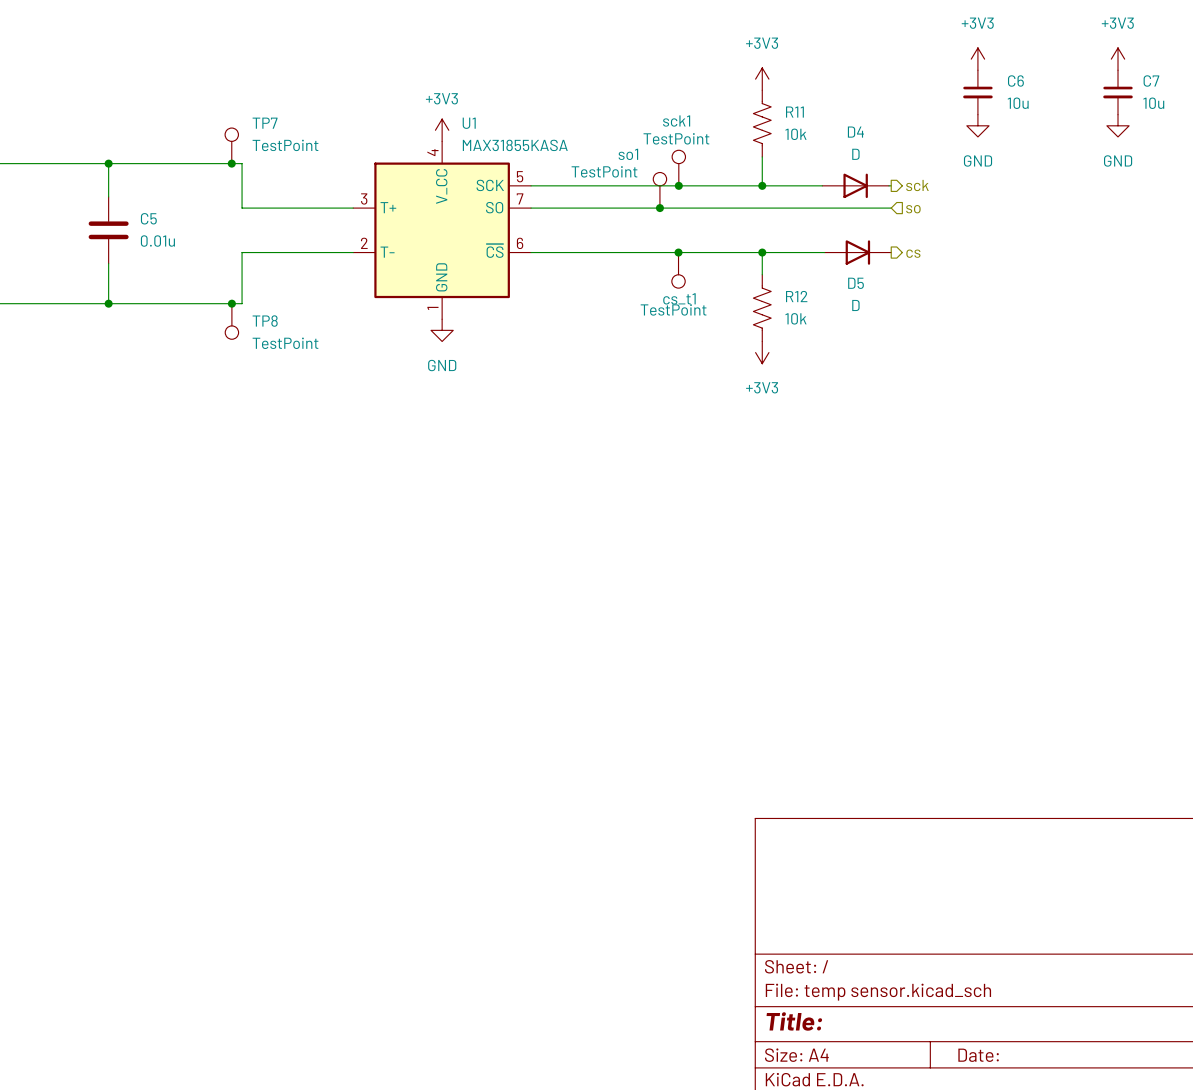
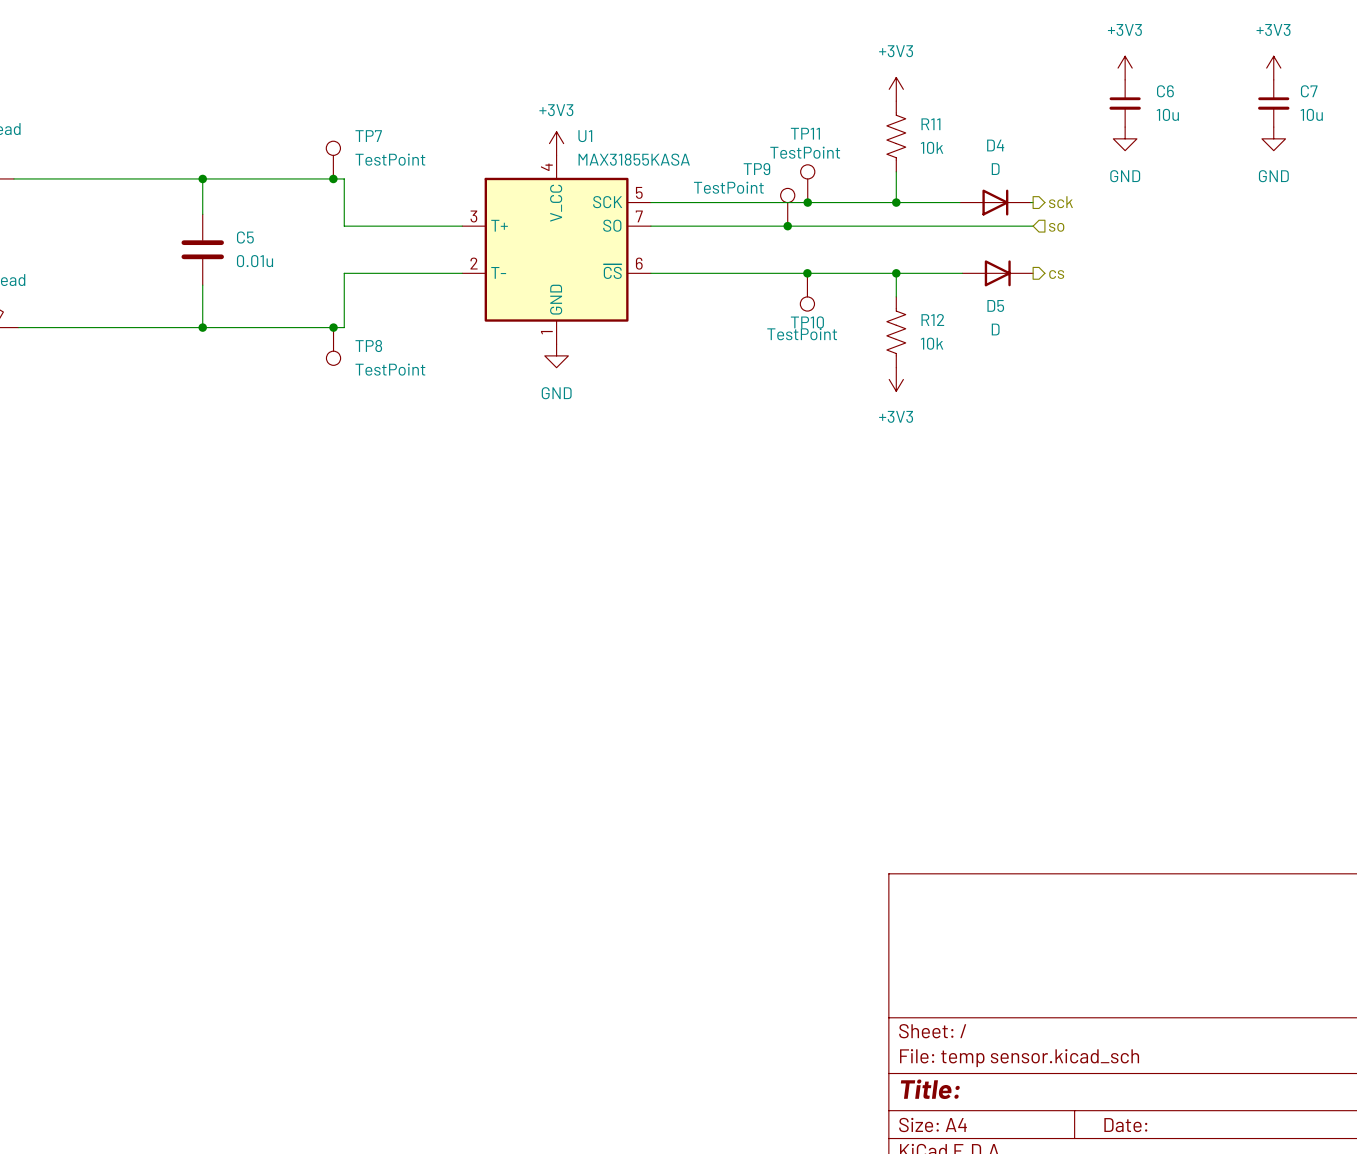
sck1 name: sck1 (676, 121) -> TP11 (805, 133)
so1 name: so1 (628, 154) -> TP9 (756, 169)
cs_t1 name: cs_t1 (679, 298) -> TP10 (807, 322)

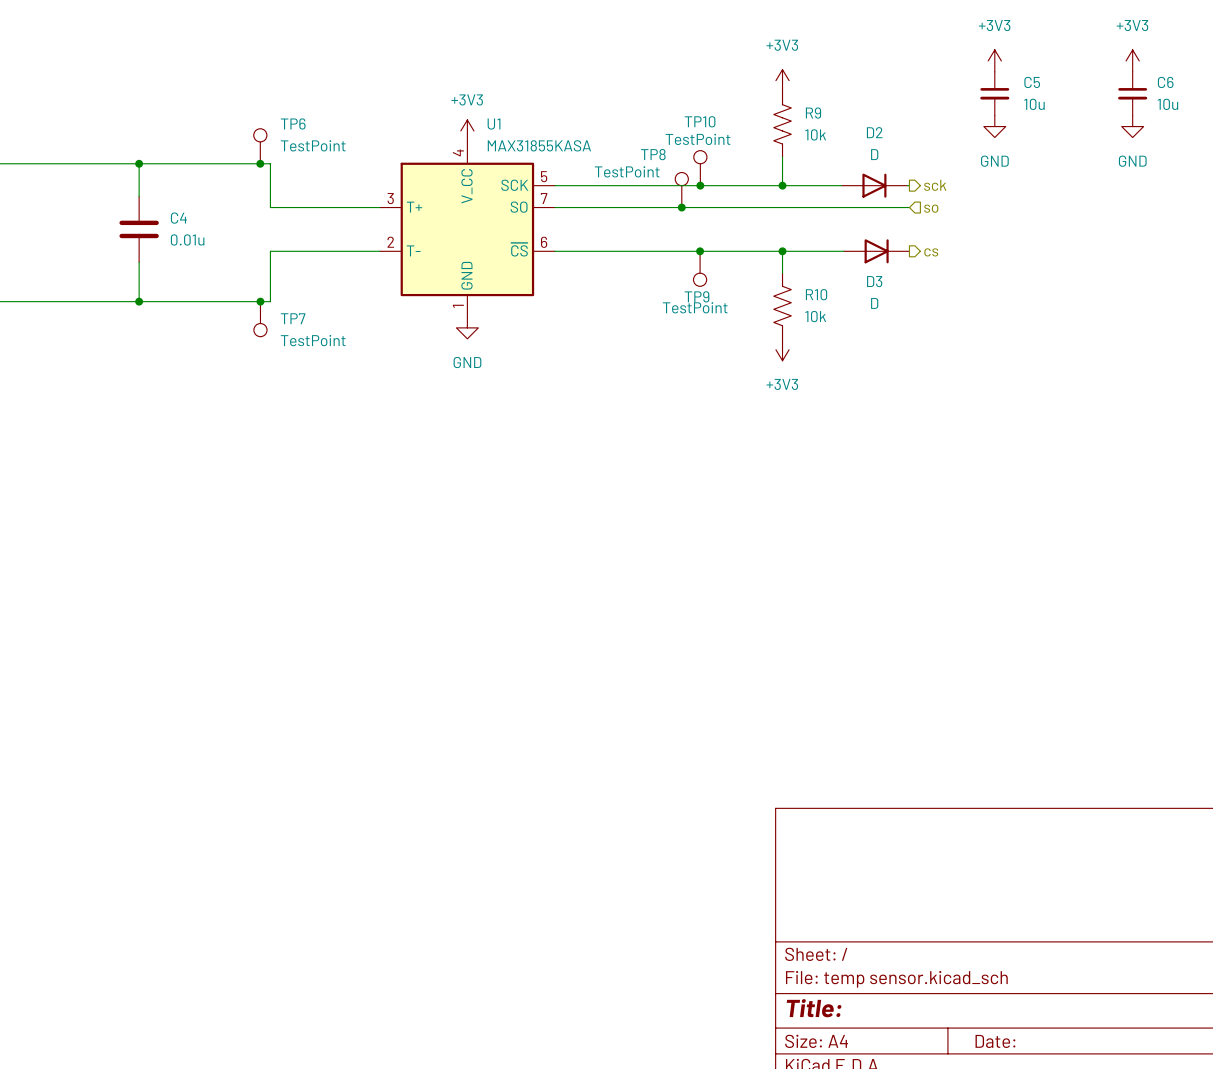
C6 name: C6 (1165, 91) -> C5 (1032, 82)
C7 name: C7 (1309, 91) -> C6 (1165, 82)
R11 name: R11 (930, 124) -> R9 (813, 113)
TP11 name: TP11 (805, 133) -> TP10 (700, 121)
TP7 name: TP7 (368, 136) -> TP6 (293, 123)
D4 name: D4 (995, 145) -> D2 (874, 132)
TP9 name: TP9 (756, 169) -> TP8 (653, 154)
C5 name: C5 (245, 237) -> C4 (178, 218)
D5 name: D5 (995, 305) -> D3 (874, 281)
R12 name: R12 (932, 320) -> R10 (816, 294)
TP10 name: TP10 (807, 322) -> TP9 (697, 296)
TP8 name: TP8 (368, 346) -> TP7 (293, 318)

